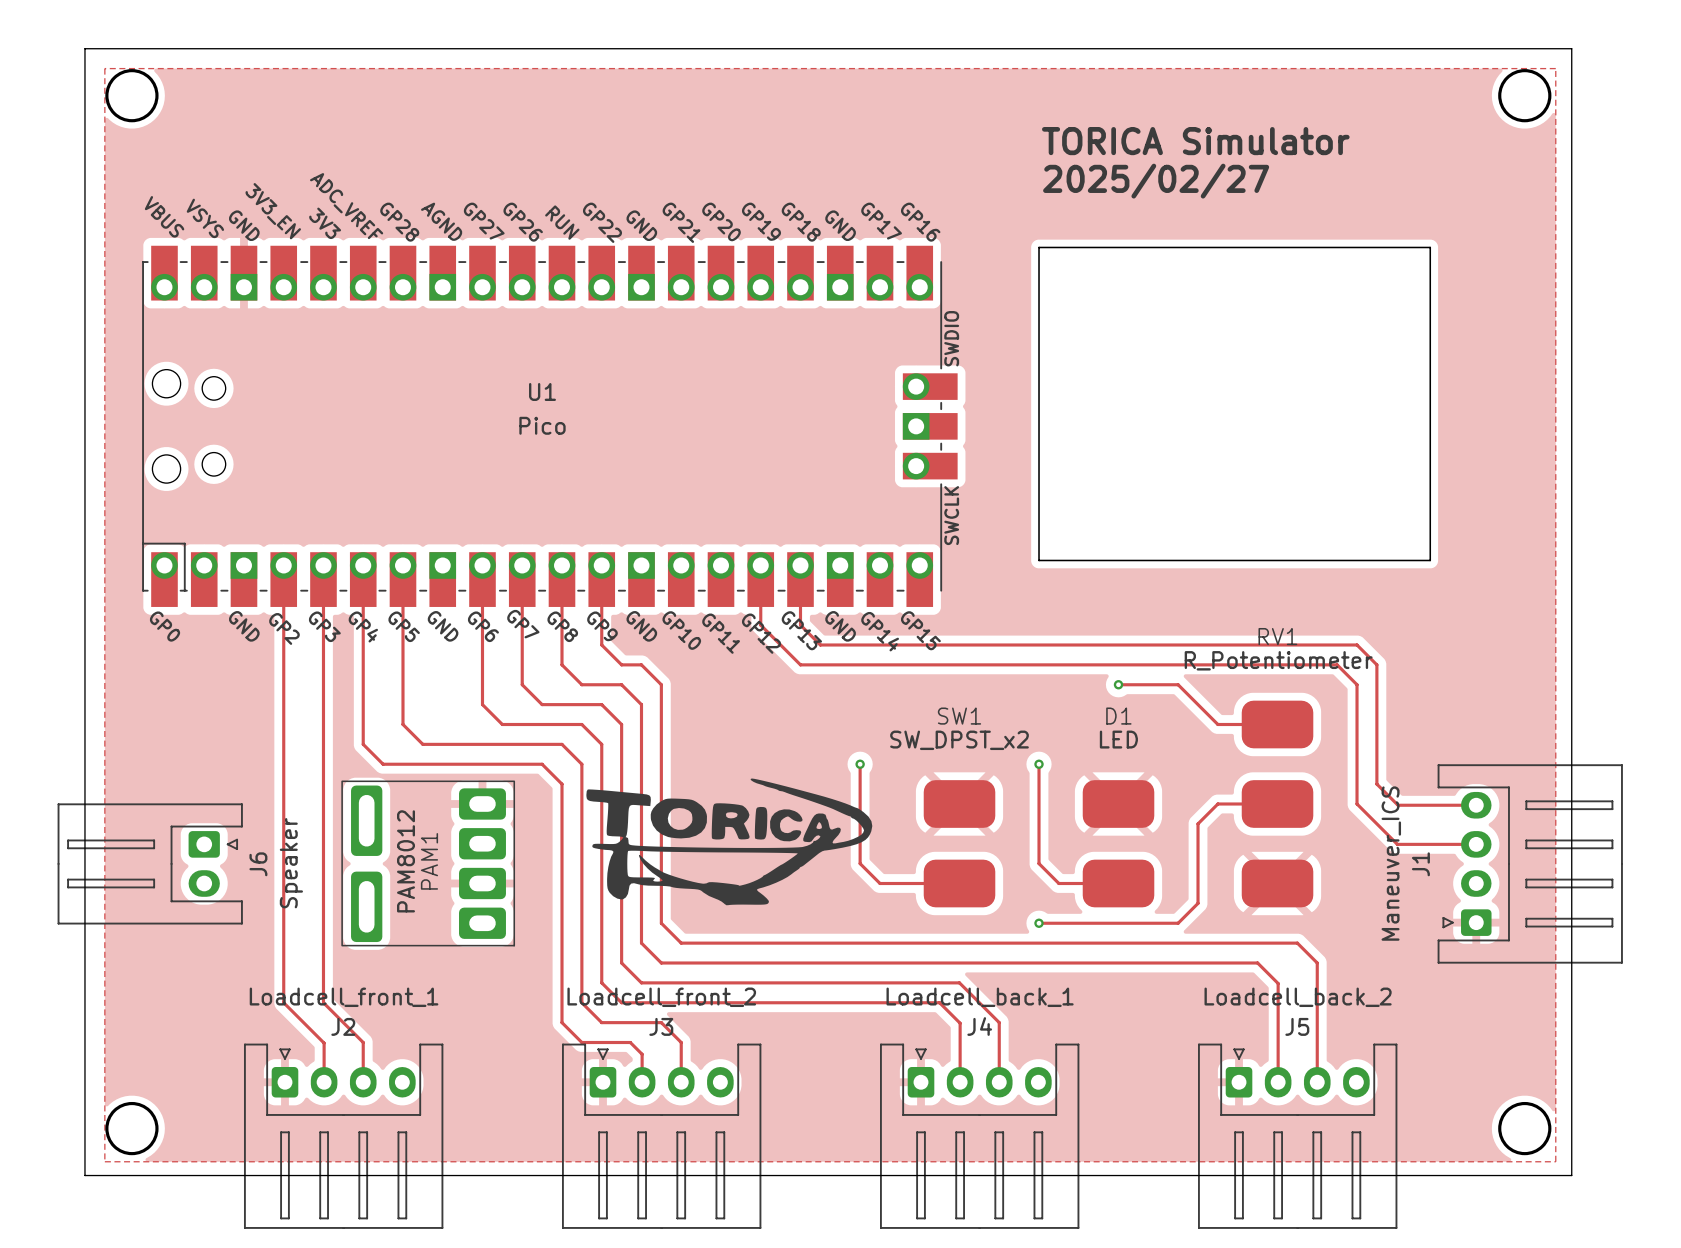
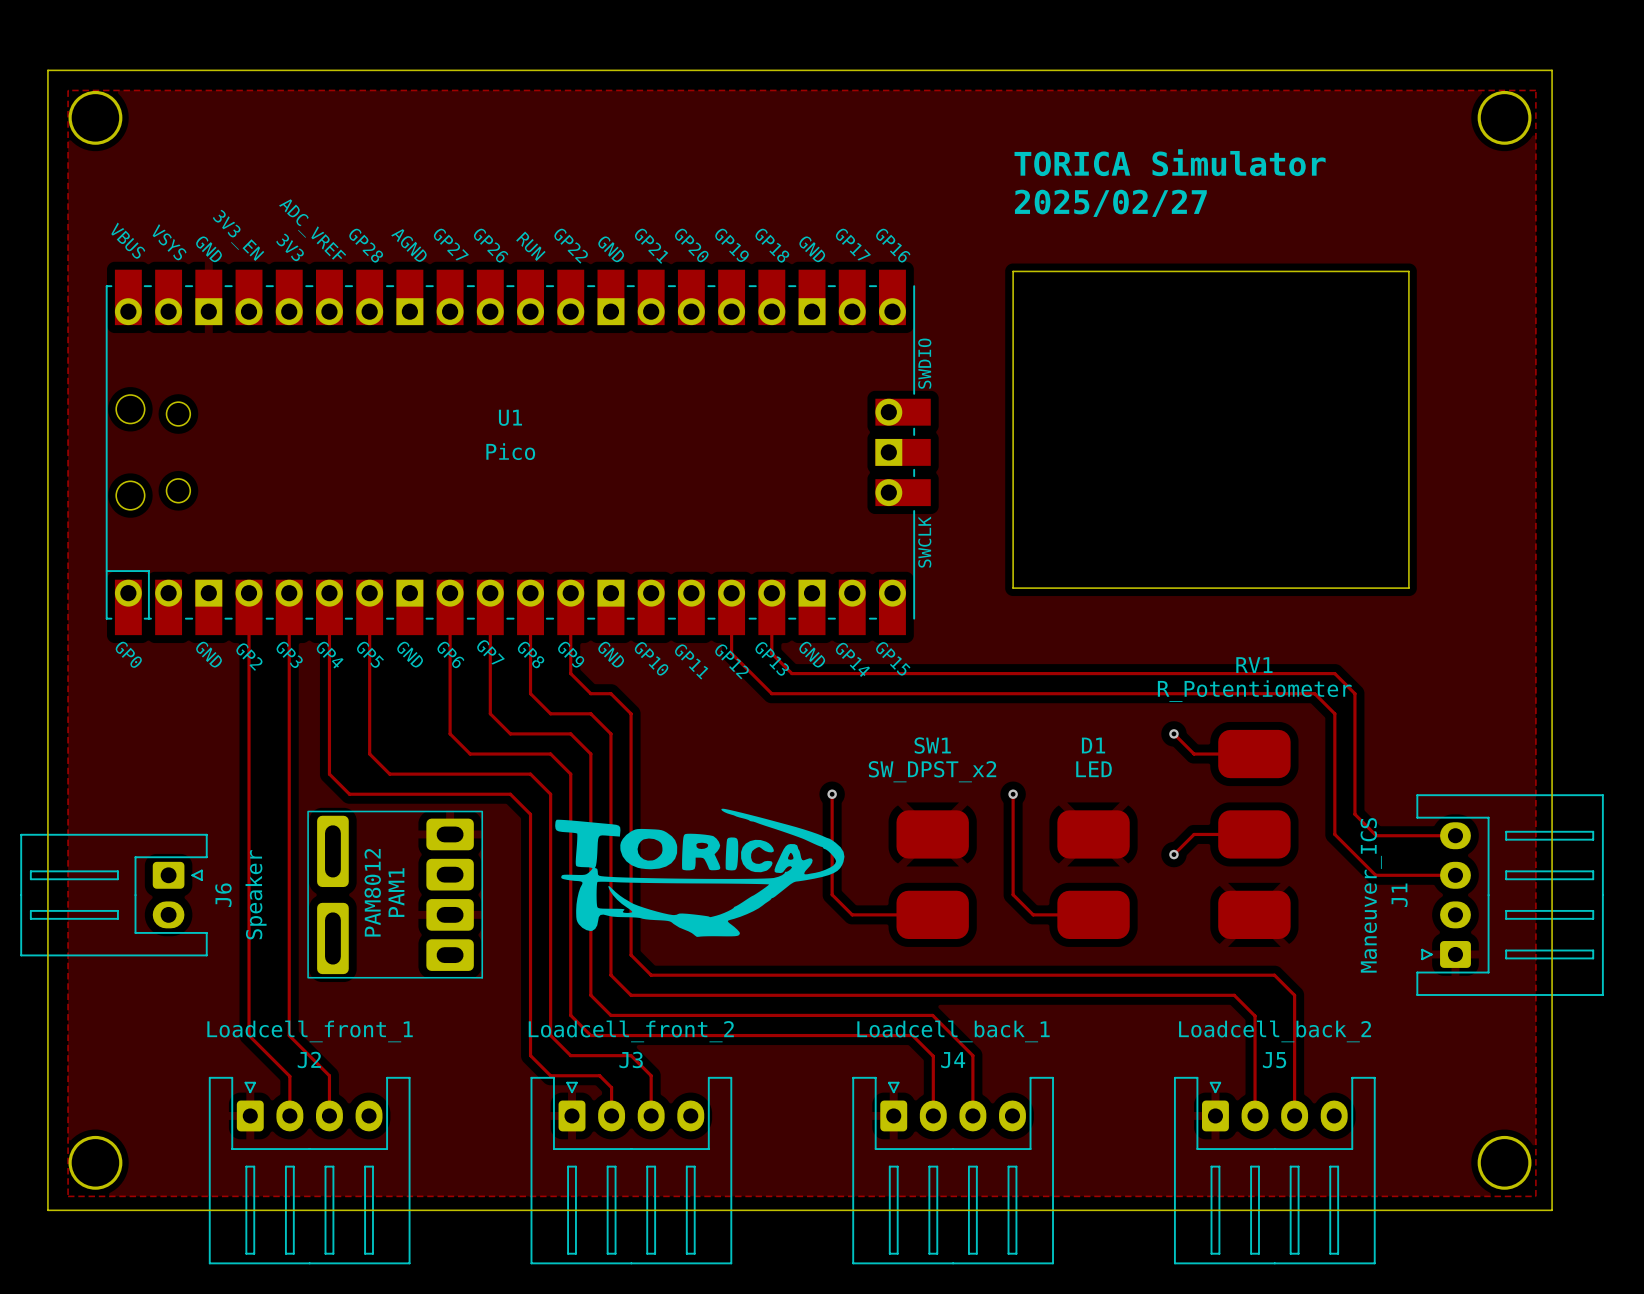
track: (1118, 684) (1178, 684) (1198, 704) -> none
via: (1118, 684) -> none
via: none -> (1173, 733)
track: (1198, 823) (1198, 903) (1178, 923) (1039, 923) -> none
via: none -> (1173, 854)
via: (1039, 923) -> none

